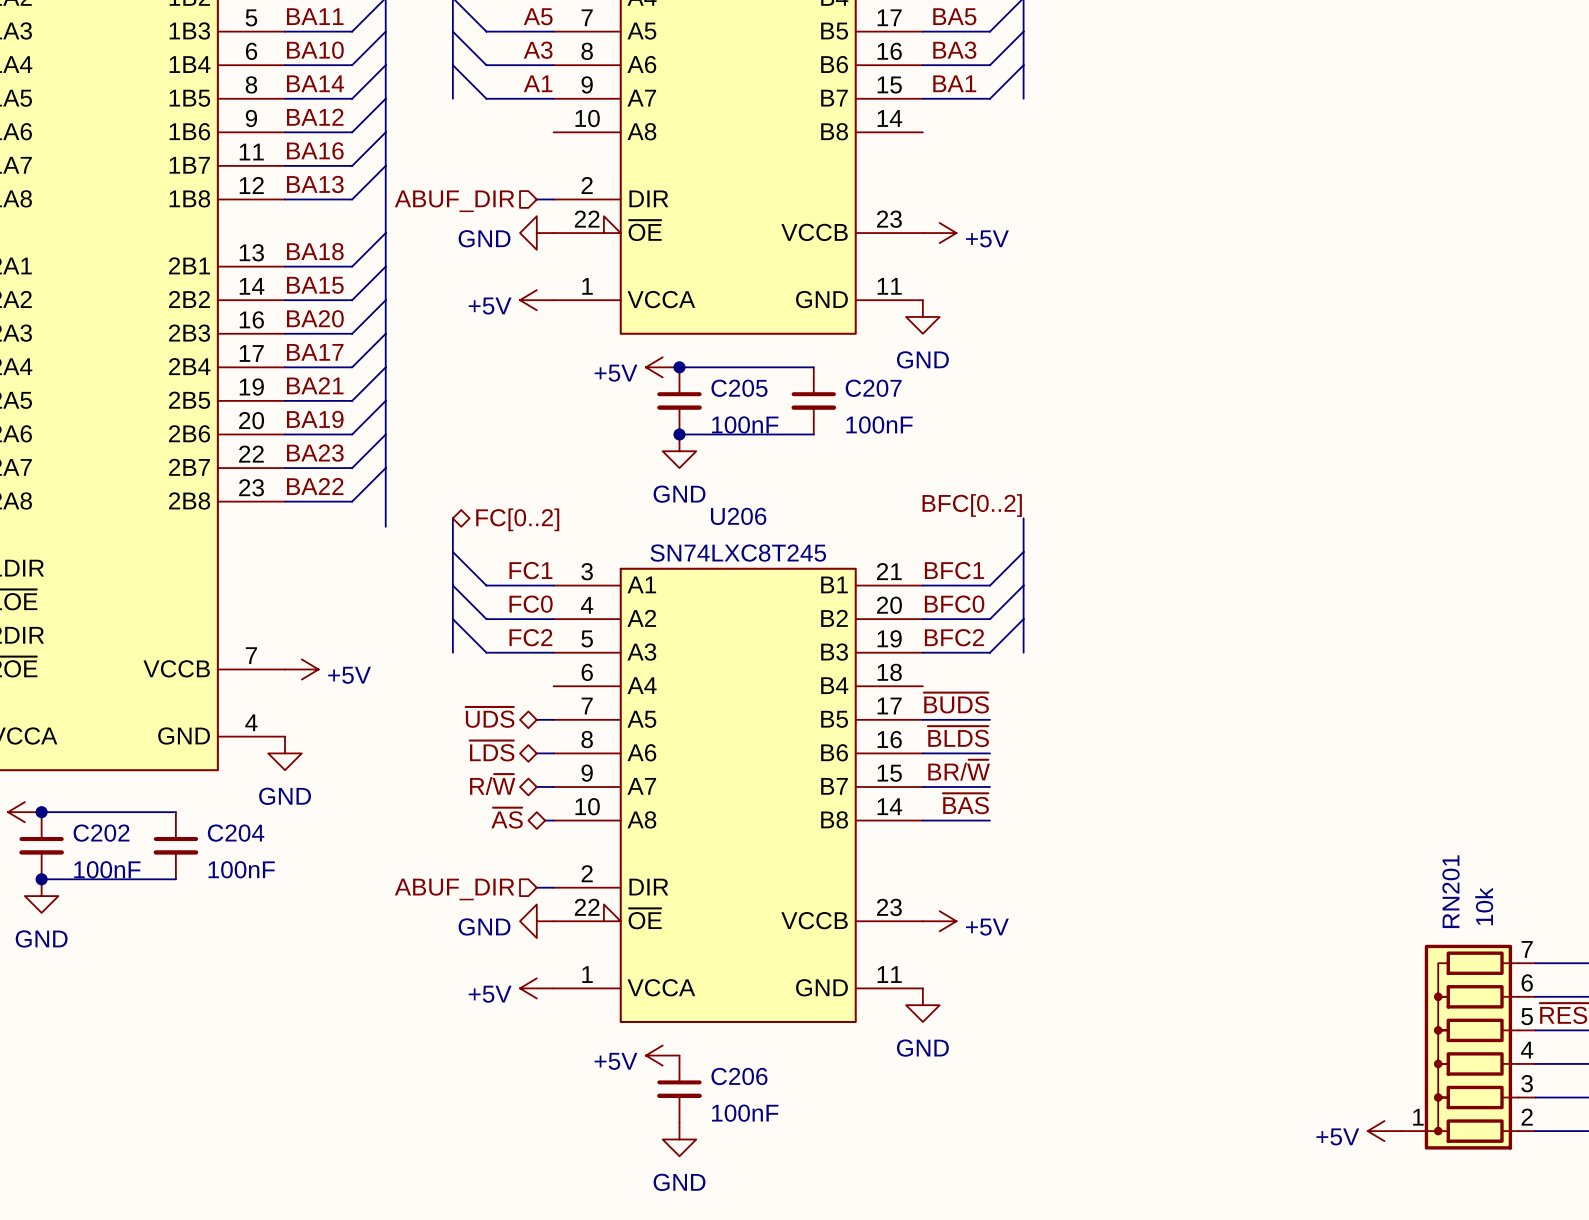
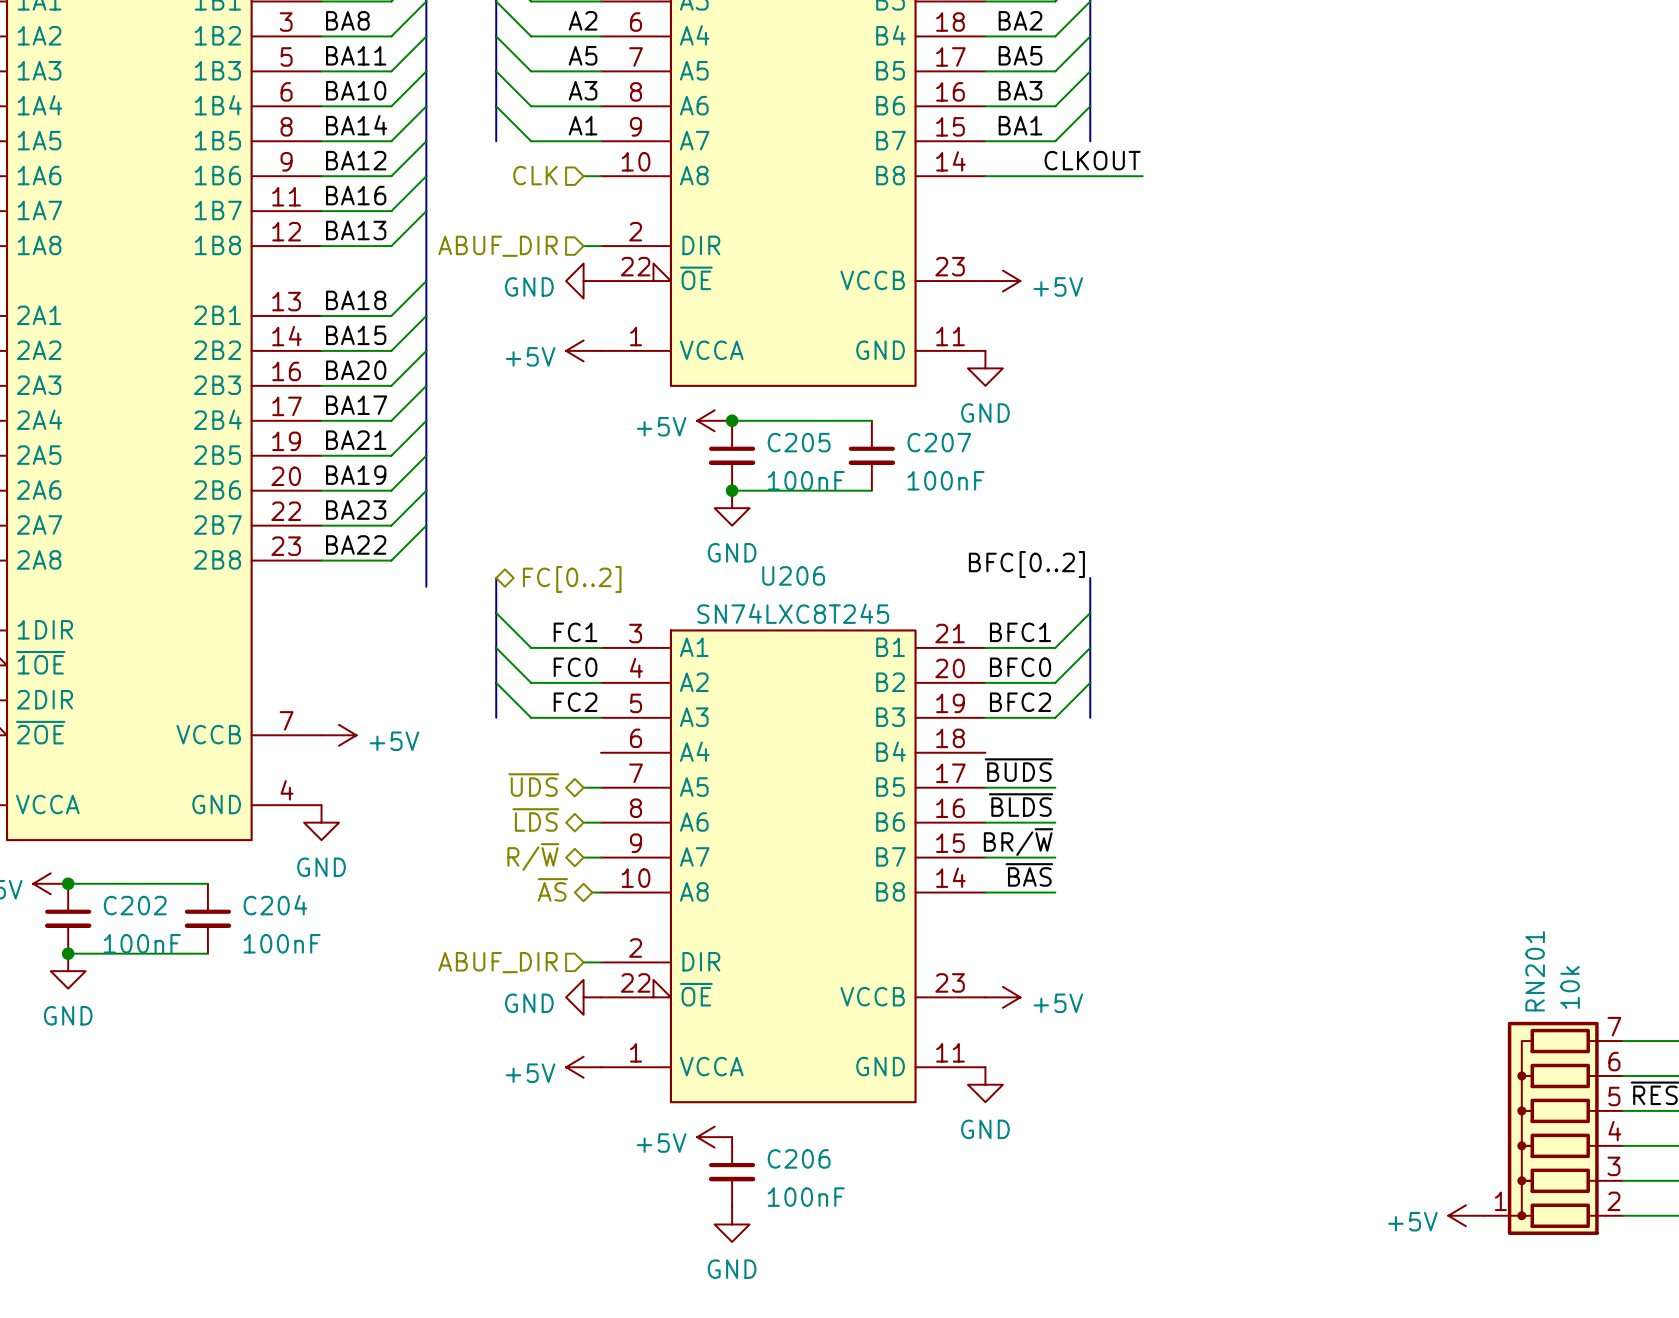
label: none -> CLKOUT (1092, 160)
hierarchical label: none -> CLK (535, 175)
wire: none -> (583, 176) (601, 176)
wire: none -> (985, 176) (1142, 176)

